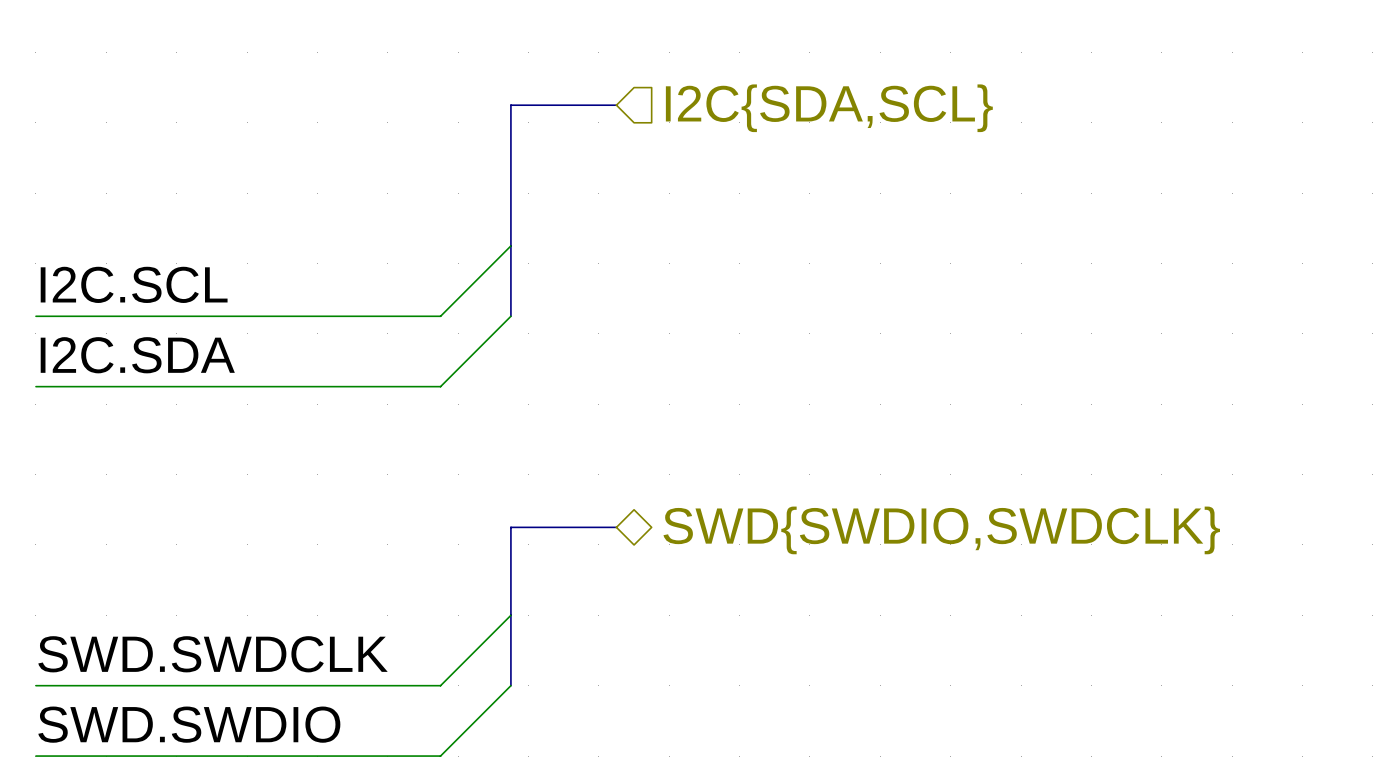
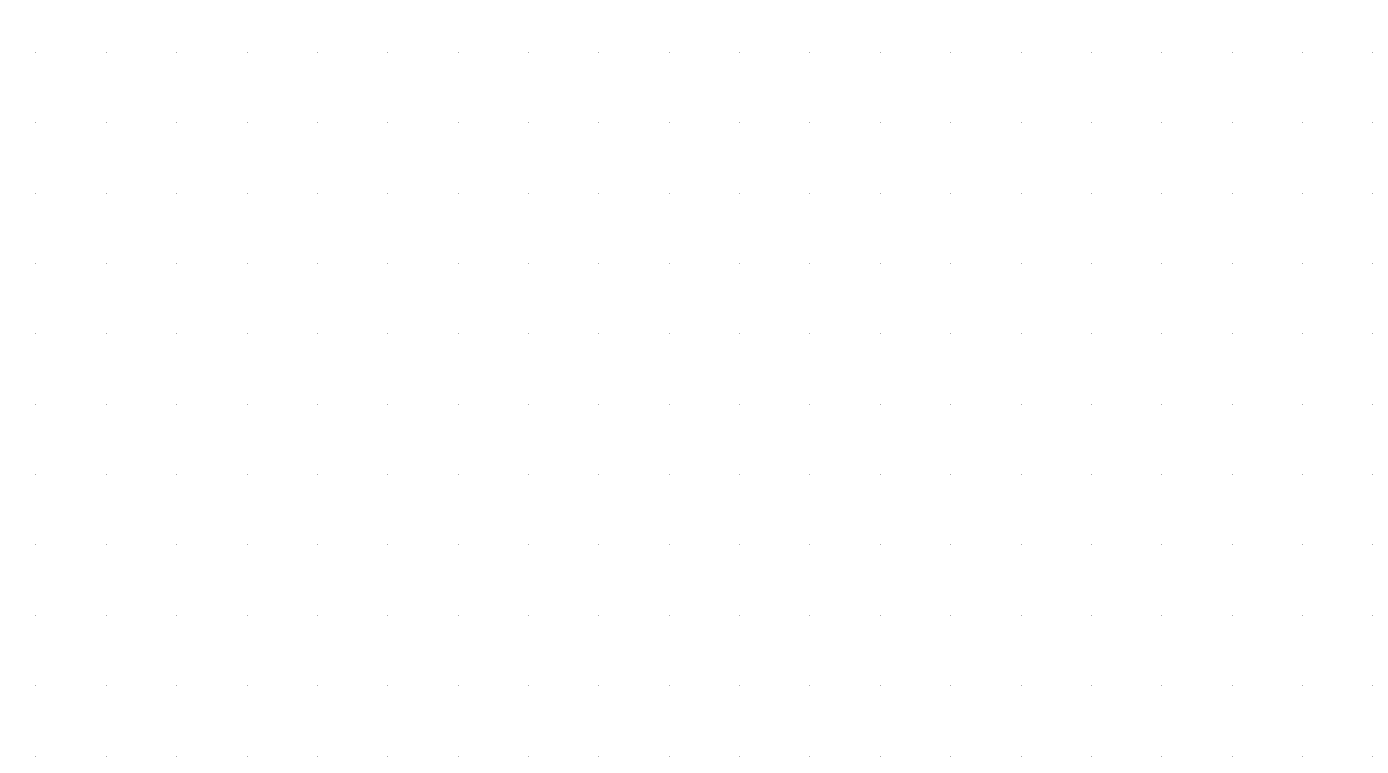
bus: (616, 105) (510, 105) (510, 316) -> none
hierarchical label: I2C{SDA,SCL} (829, 108) -> none
wire: (510, 245) (440, 316) -> none
label: I2C.SCL (134, 284) -> none
wire: (35, 316) (440, 316) -> none
wire: (510, 316) (440, 386) -> none
label: I2C.SDA (137, 355) -> none
wire: (35, 386) (440, 386) -> none
bus: (616, 527) (510, 527) (510, 685) -> none
hierarchical label: SWD{SWDIO,SWDCLK} (941, 530) -> none
wire: (510, 615) (440, 685) -> none
label: SWD.SWDCLK (213, 654) -> none
wire: (35, 685) (440, 685) -> none
wire: (510, 685) (440, 756) -> none
label: SWD.SWDIO (189, 724) -> none
wire: (35, 756) (440, 756) -> none

